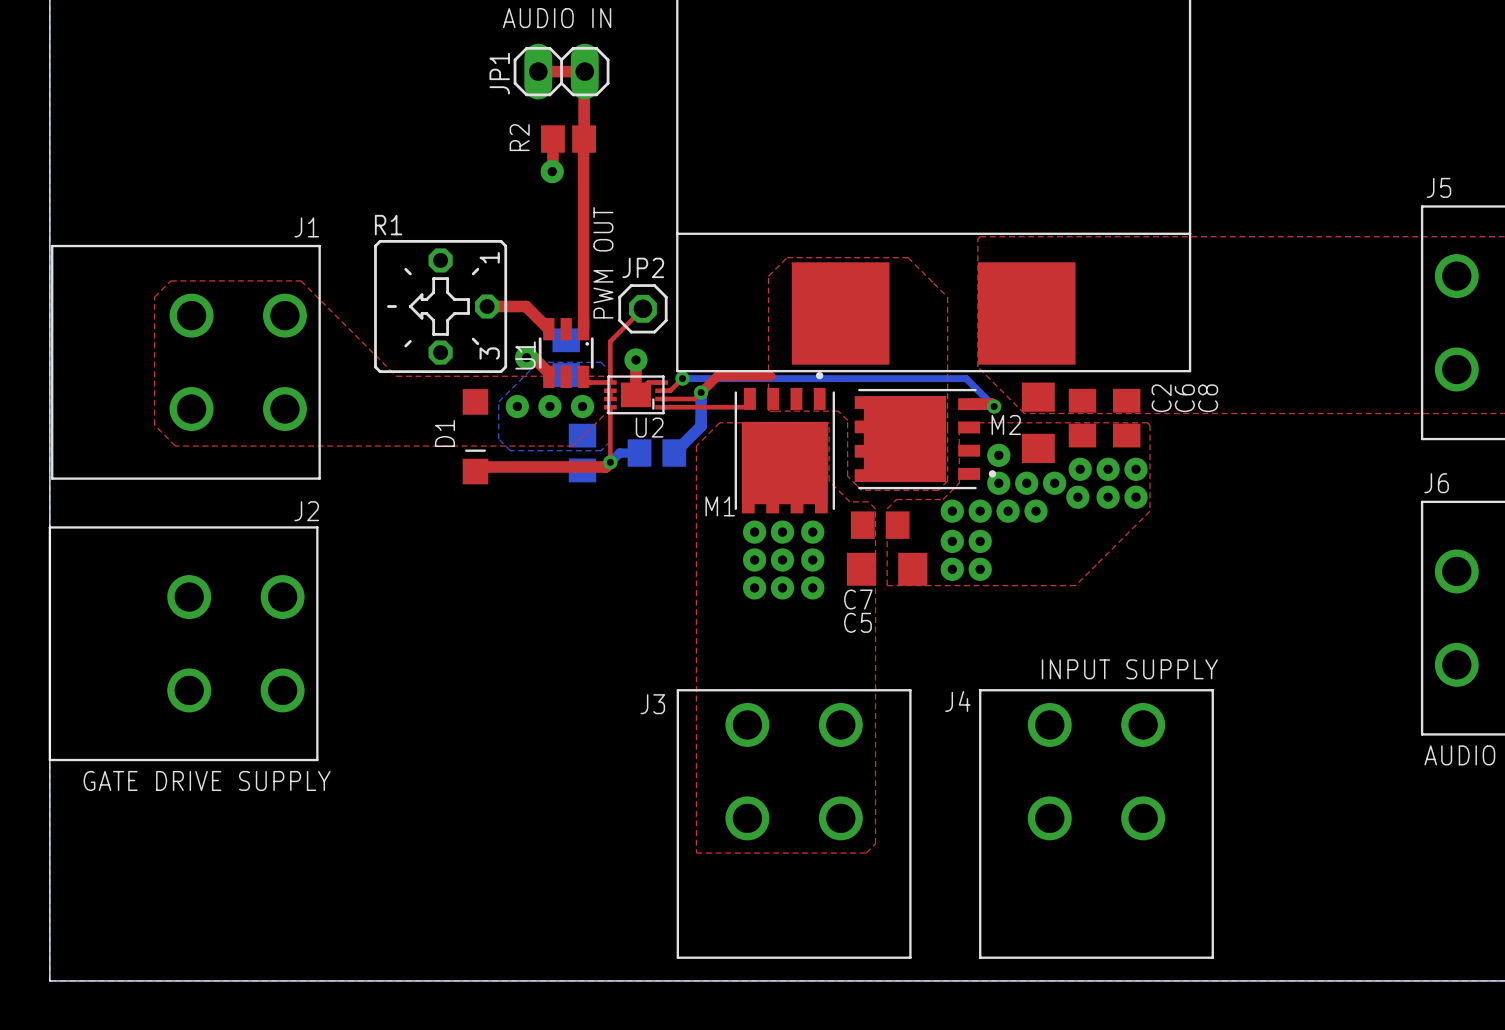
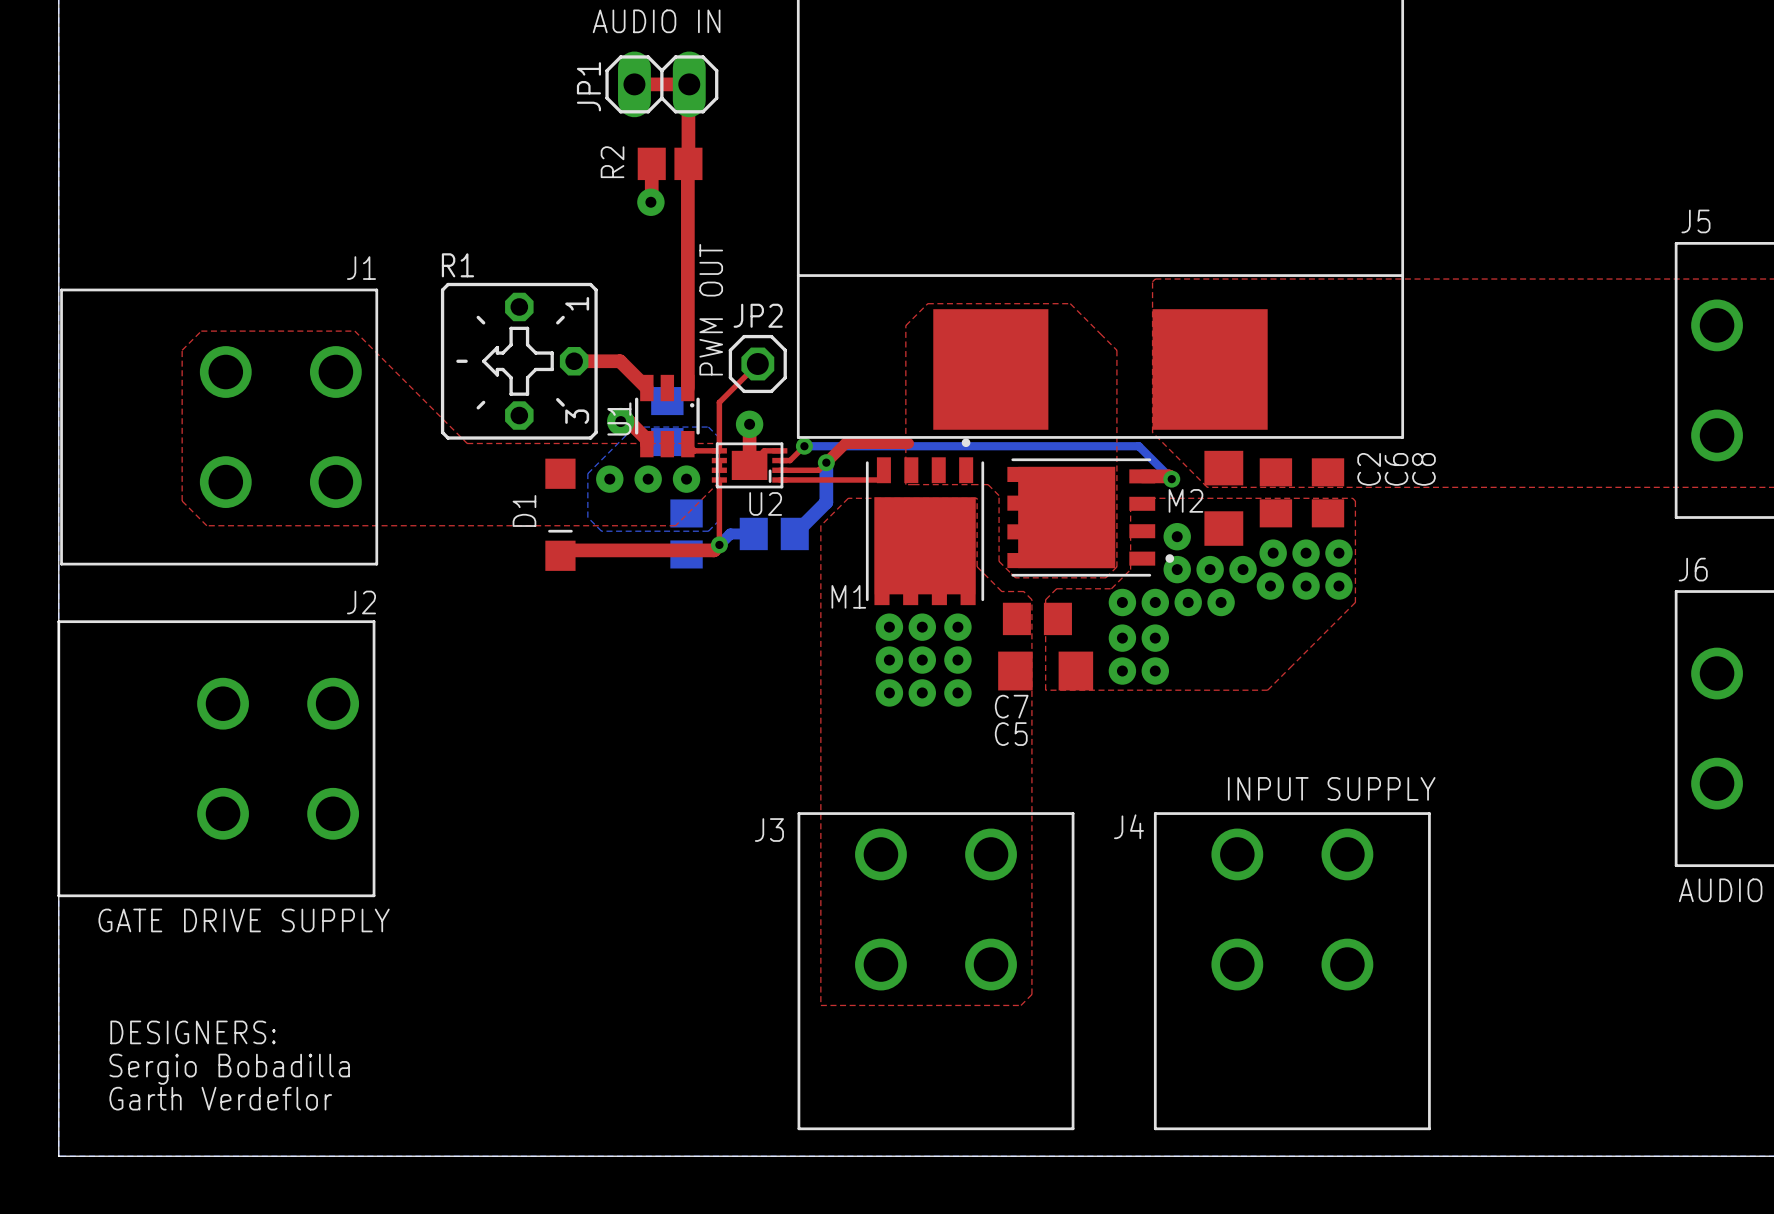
text: none -> DESIGNERS: (193, 1032)
text: none -> Sergio Bobadilla (229, 1069)
text: none -> Garth Verdeflor (220, 1098)

